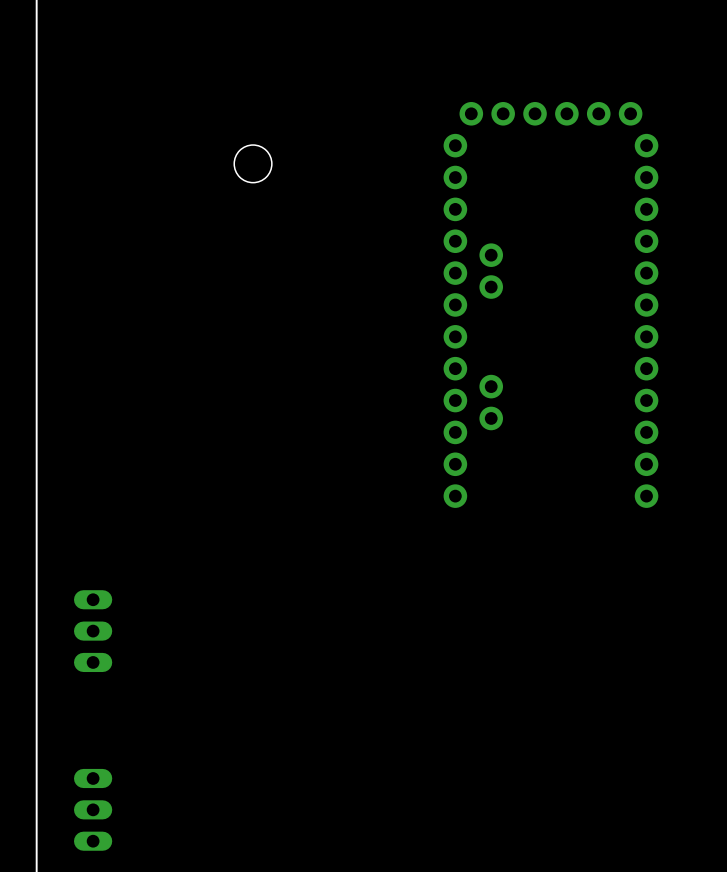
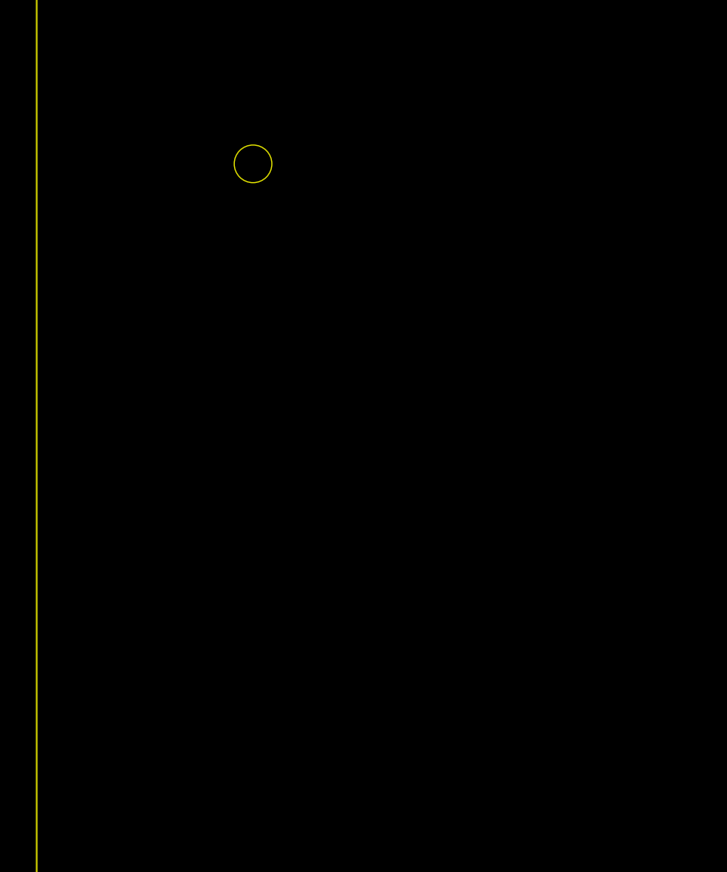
part: (550, 304) -> none
part: (93, 631) -> none
part: (93, 809) -> none

